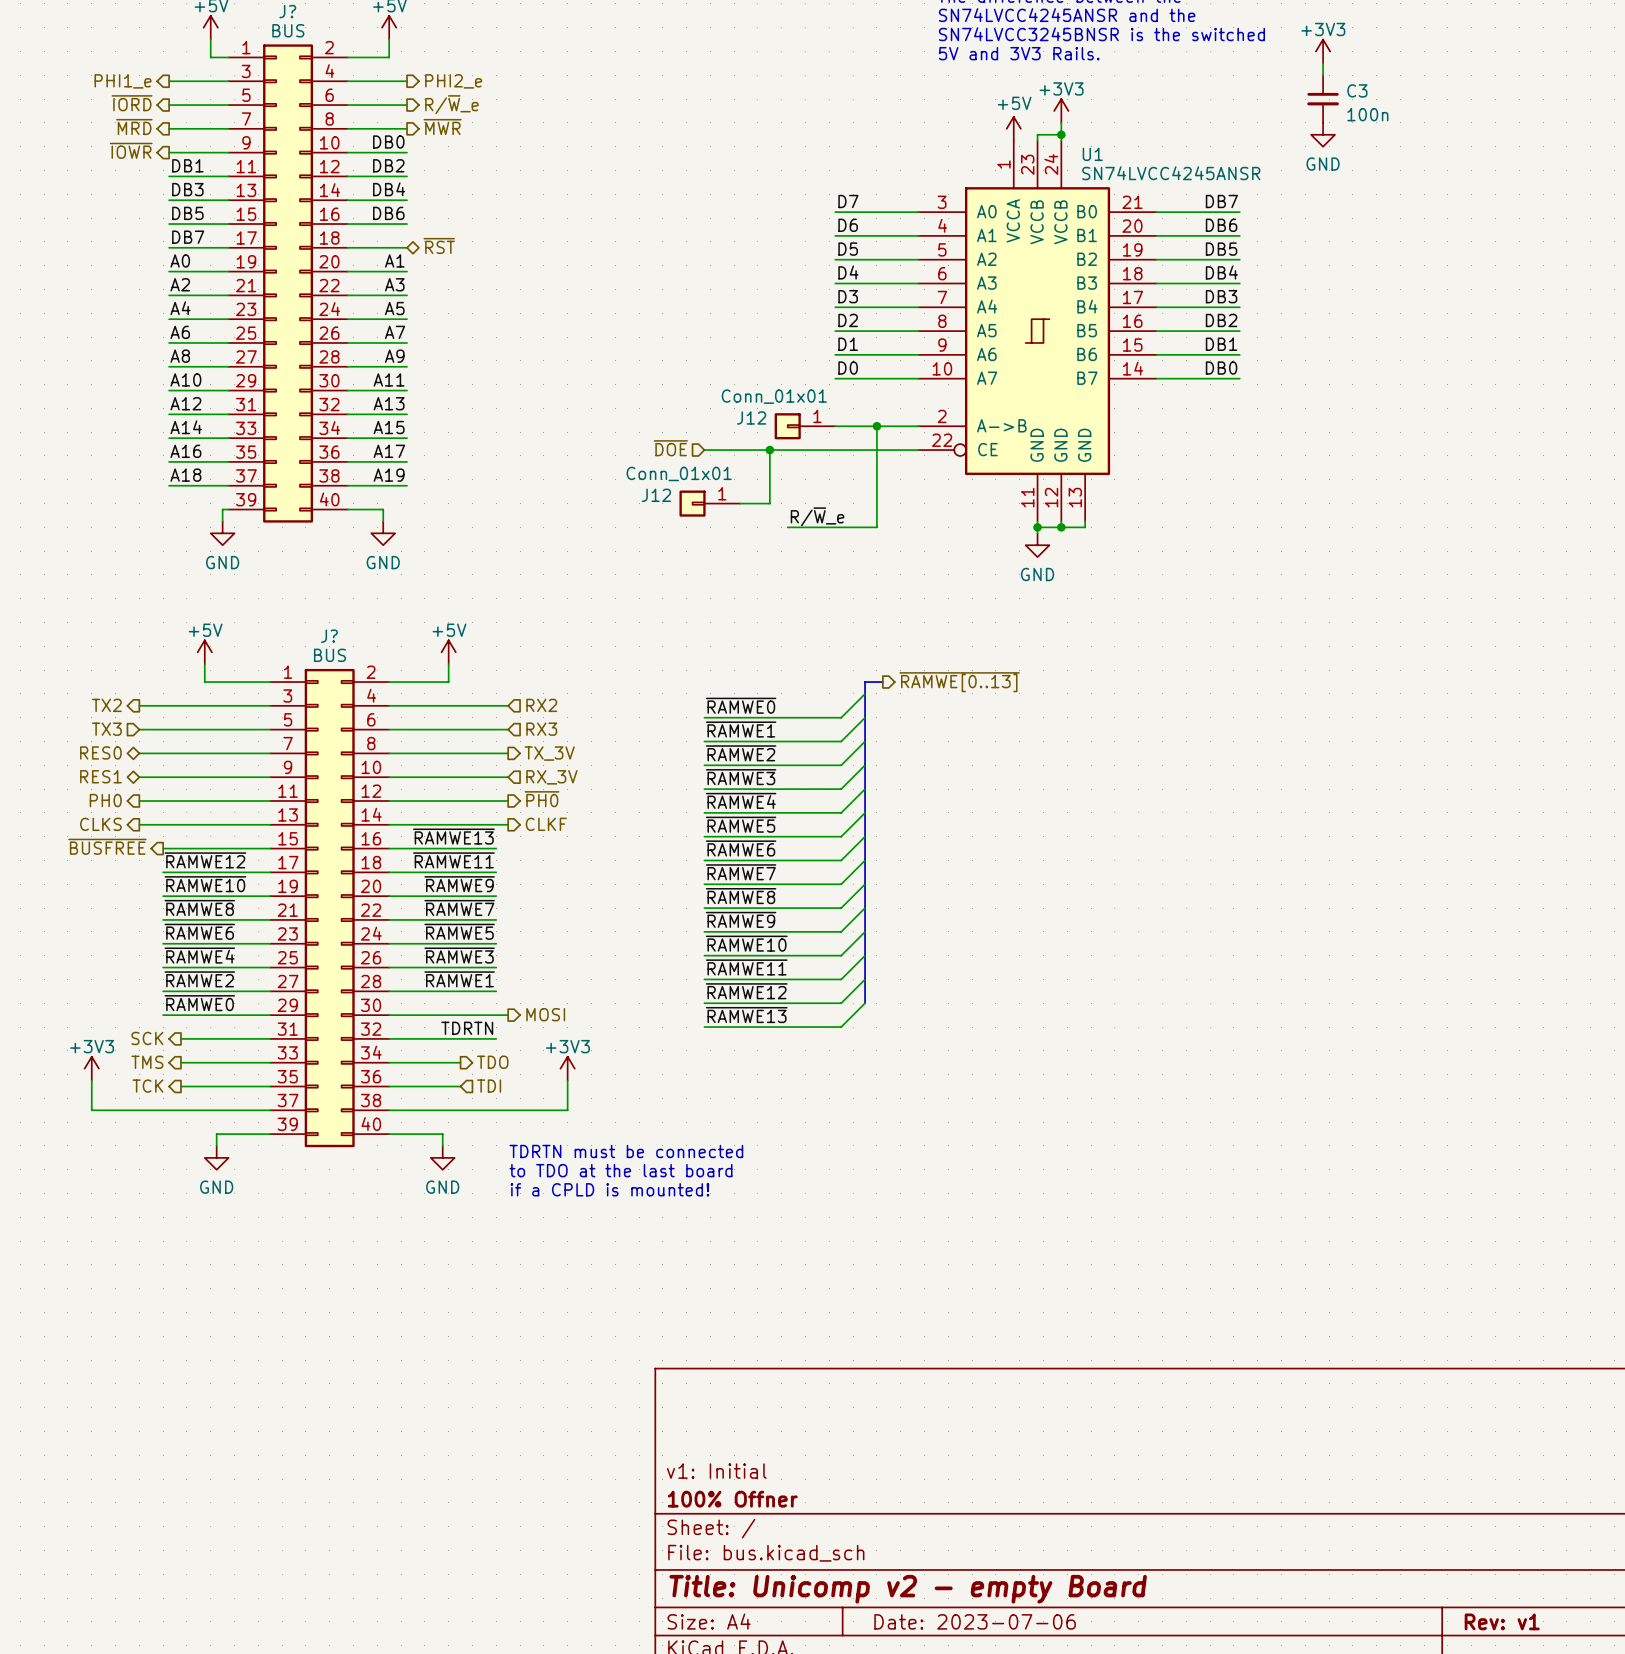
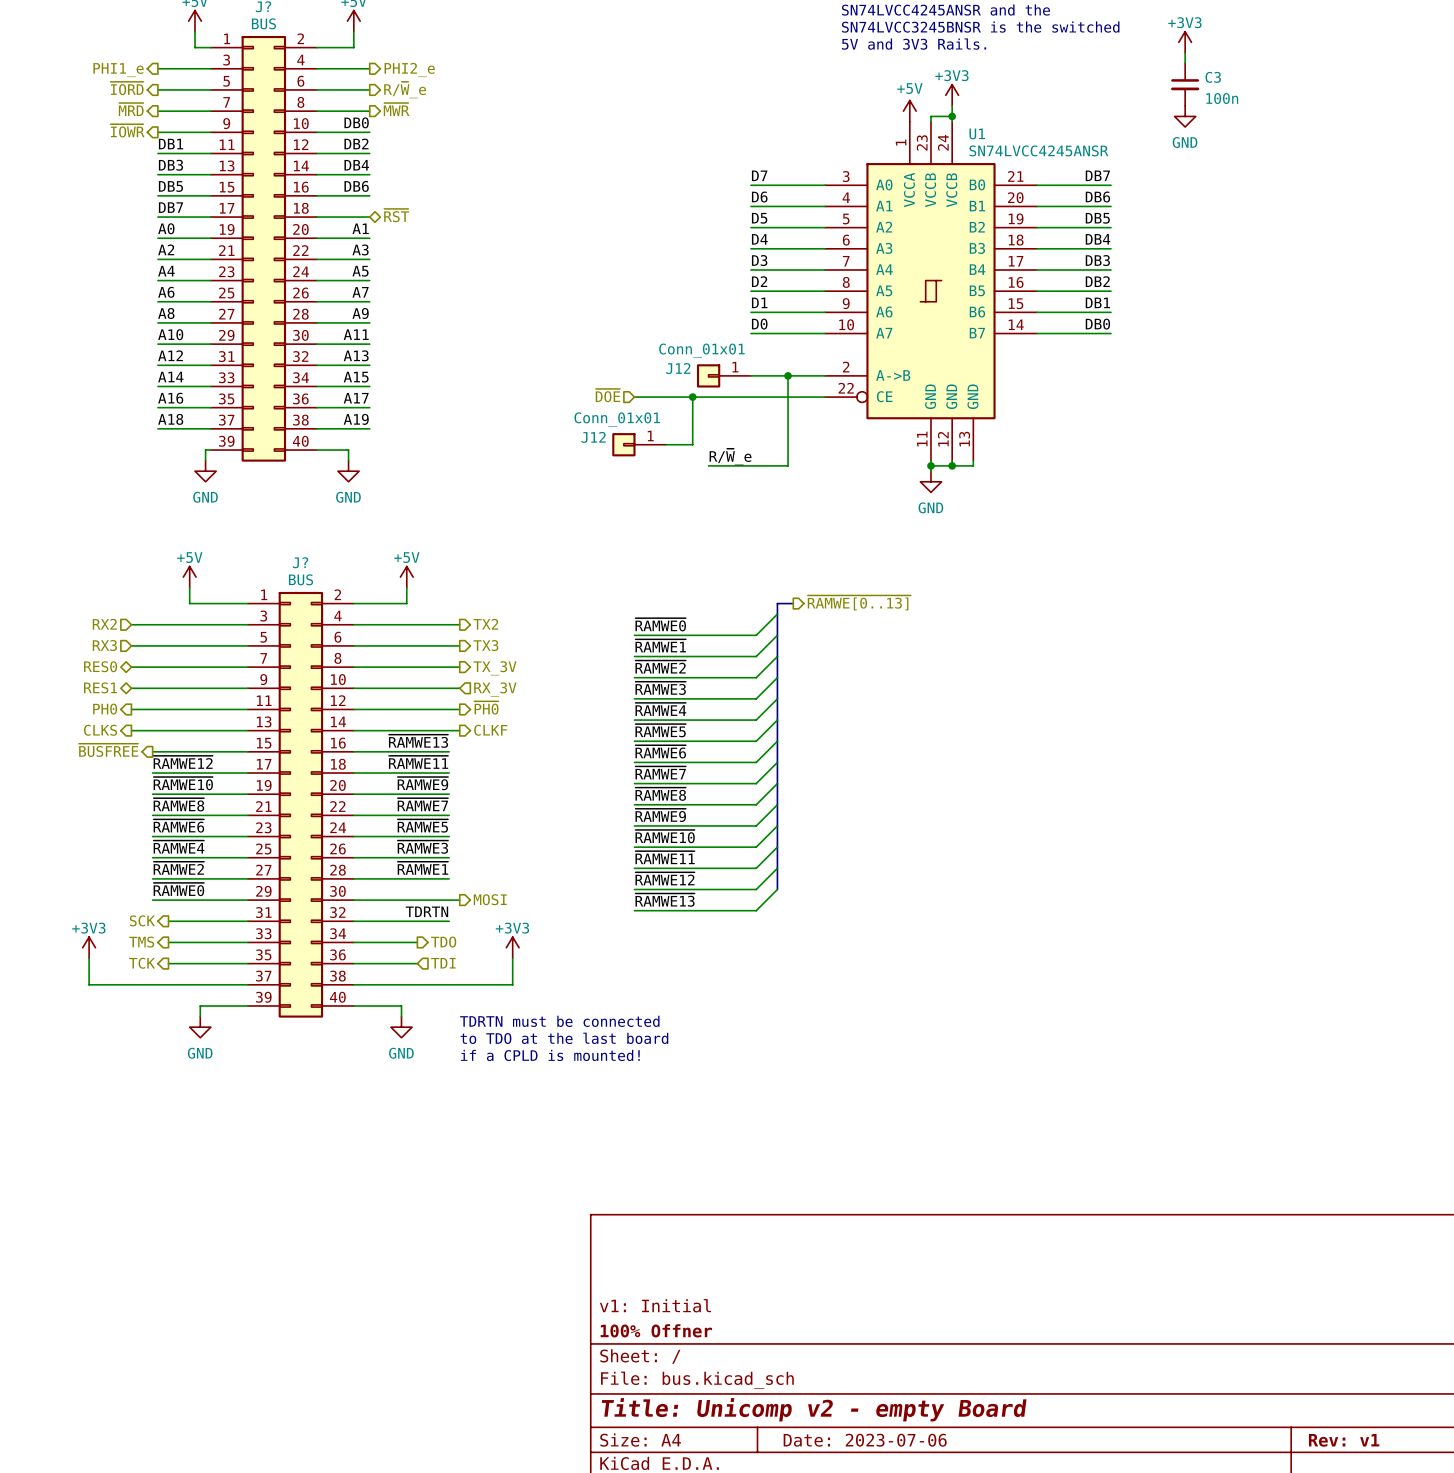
hierarchical label shape: output (106, 705) -> input (104, 624)
hierarchical label: TX2 (106, 705) -> RX2 (104, 624)
hierarchical label shape: input (541, 705) -> output (485, 624)
hierarchical label: RX2 (541, 705) -> TX2 (485, 624)
hierarchical label: TX3 (106, 729) -> RX3 (104, 645)
hierarchical label shape: input (541, 729) -> output (485, 645)
hierarchical label: RX3 (541, 729) -> TX3 (485, 645)

